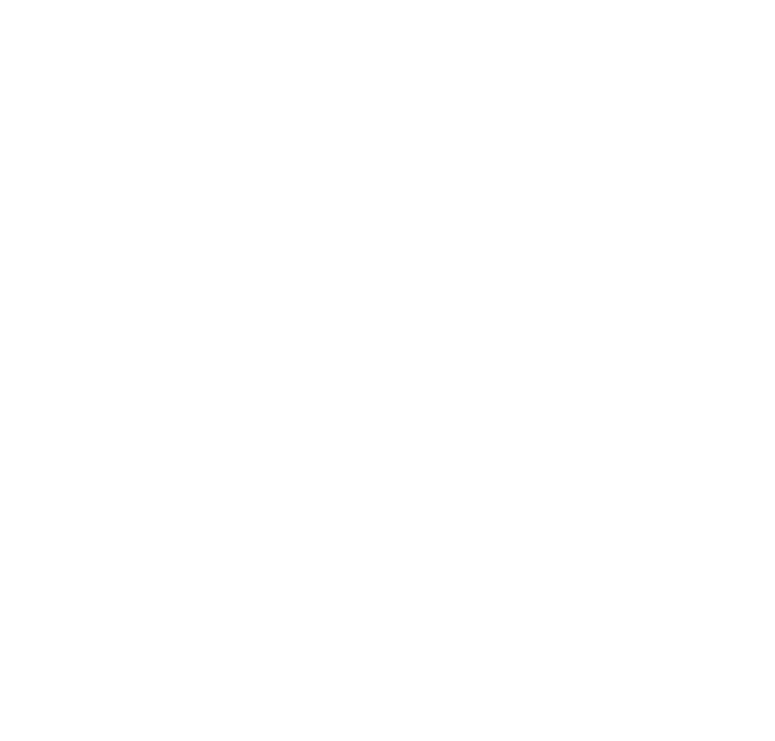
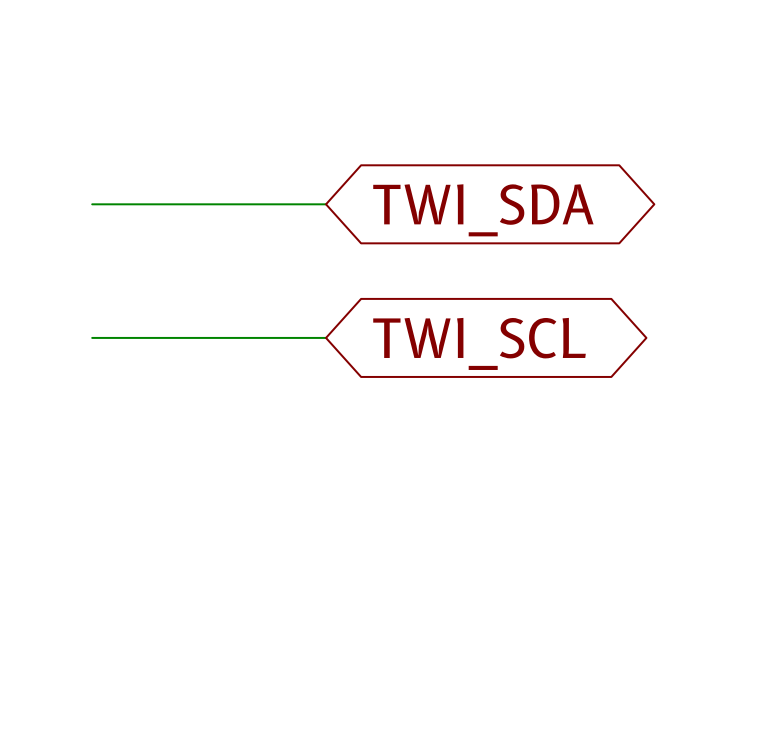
wire: none -> (92, 204) (326, 204)
global label: none -> TWI_SDA (483, 210)
wire: none -> (92, 337) (326, 337)
global label: none -> TWI_SCL (479, 343)

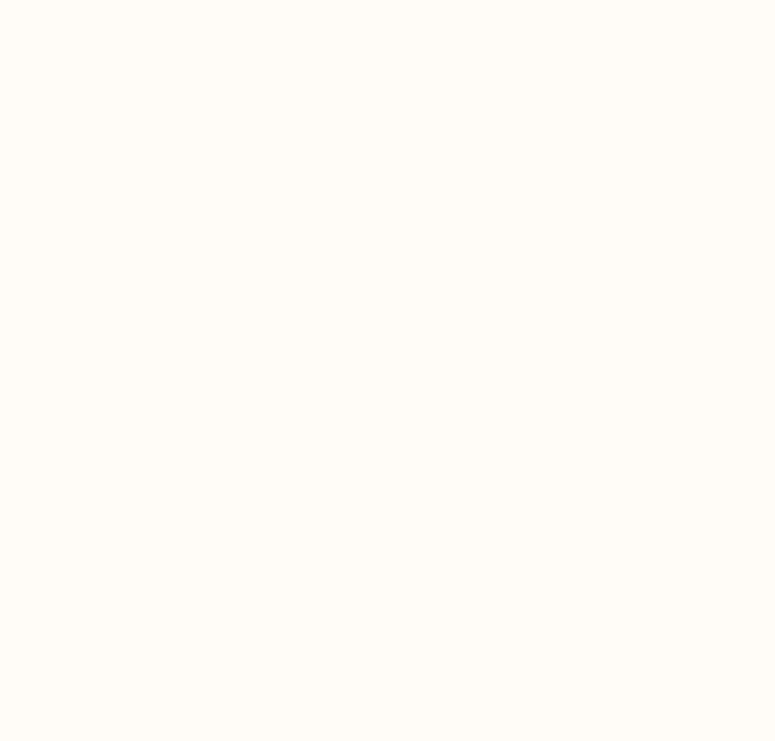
wire: (92, 204) (326, 204) -> none
global label: TWI_SDA (483, 210) -> none
wire: (92, 337) (326, 337) -> none
global label: TWI_SCL (479, 343) -> none

